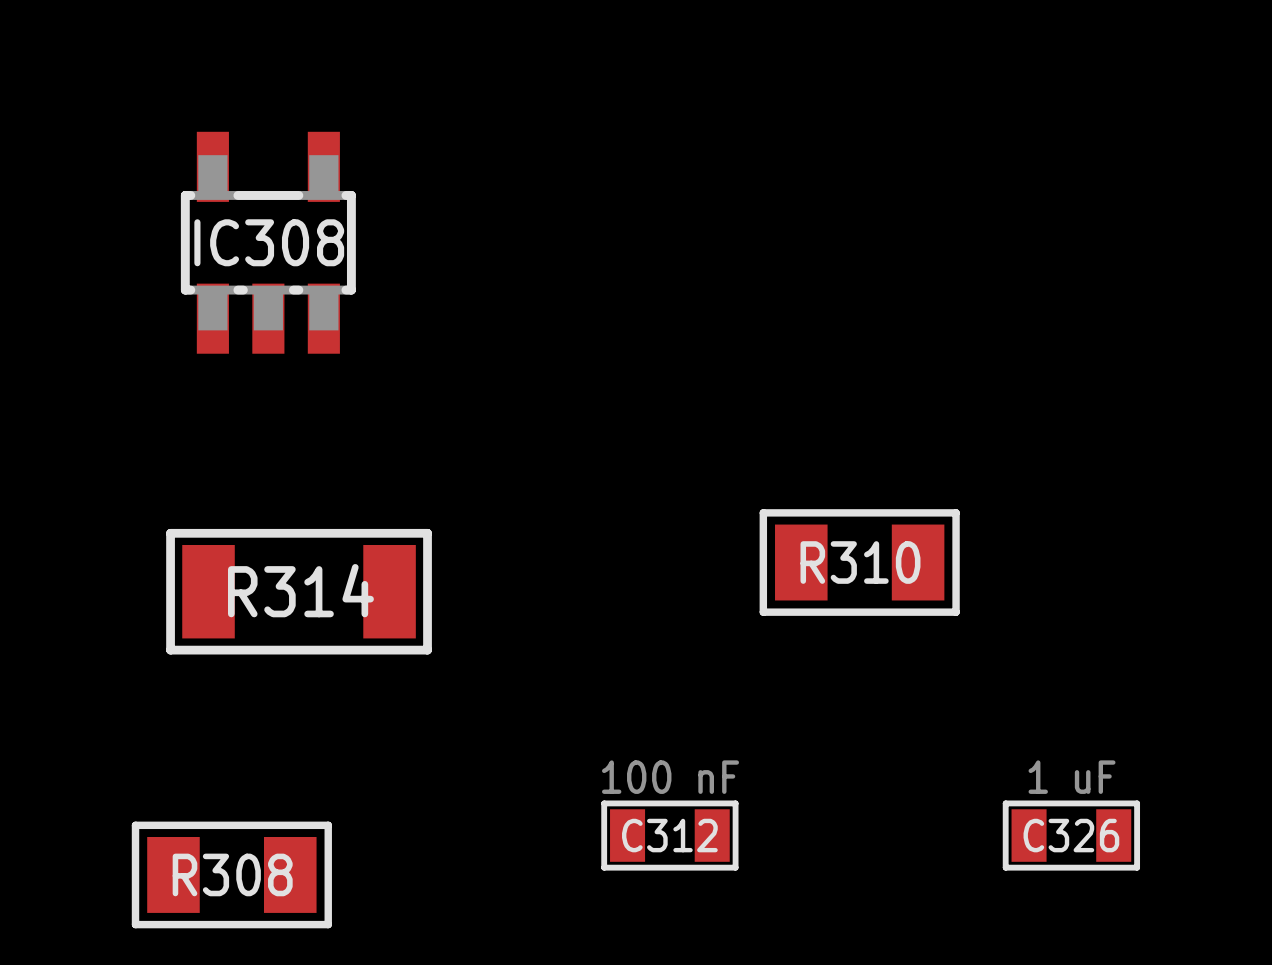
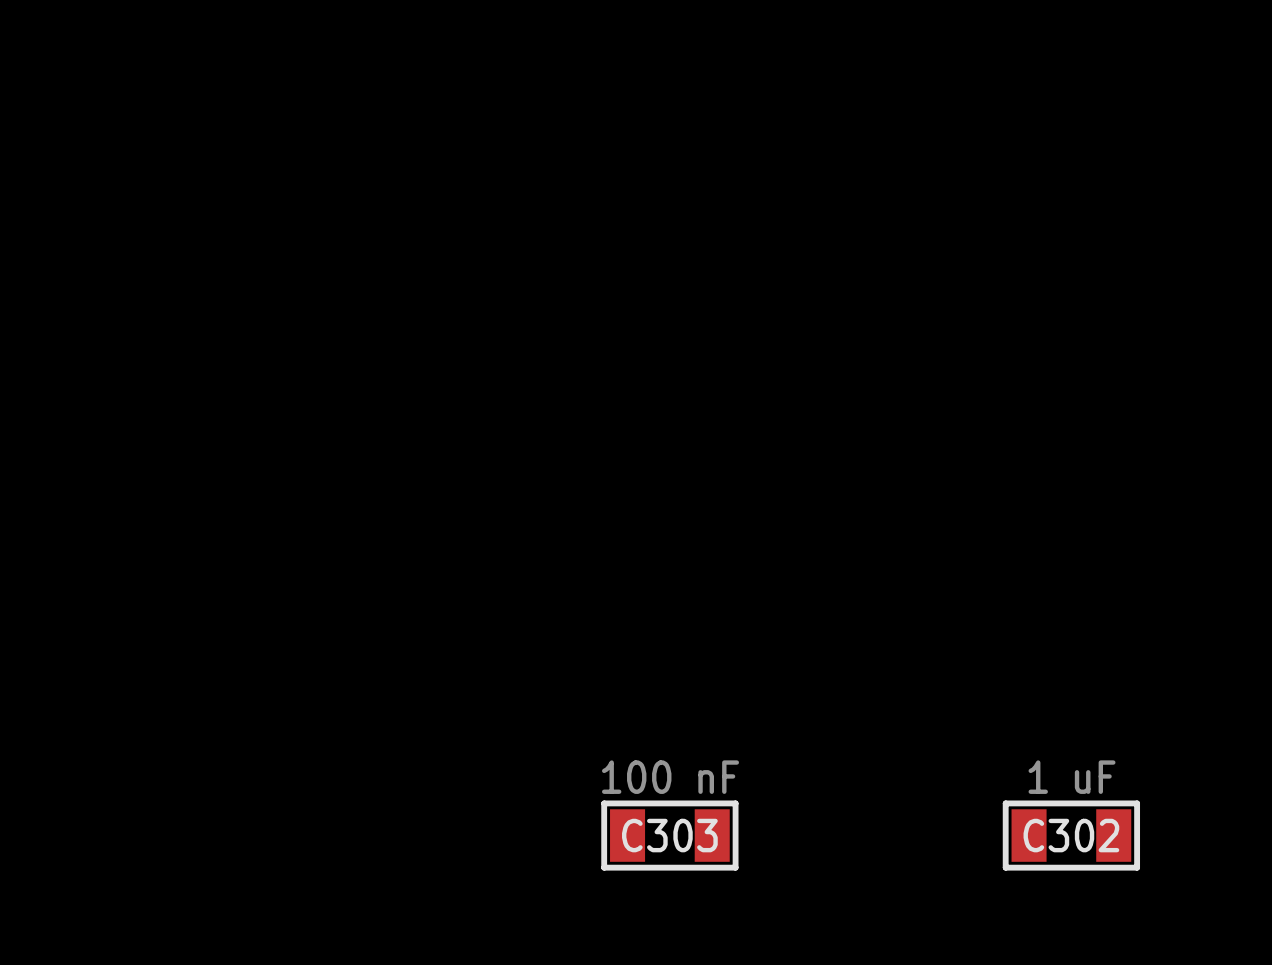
IC308: (268, 242) -> none
R310: (859, 562) -> none
R314: (299, 591) -> none
C312 name: C312 (669, 835) -> C303 (669, 835)
C326 name: C326 (1071, 835) -> C302 (1071, 835)
R308: (231, 874) -> none

